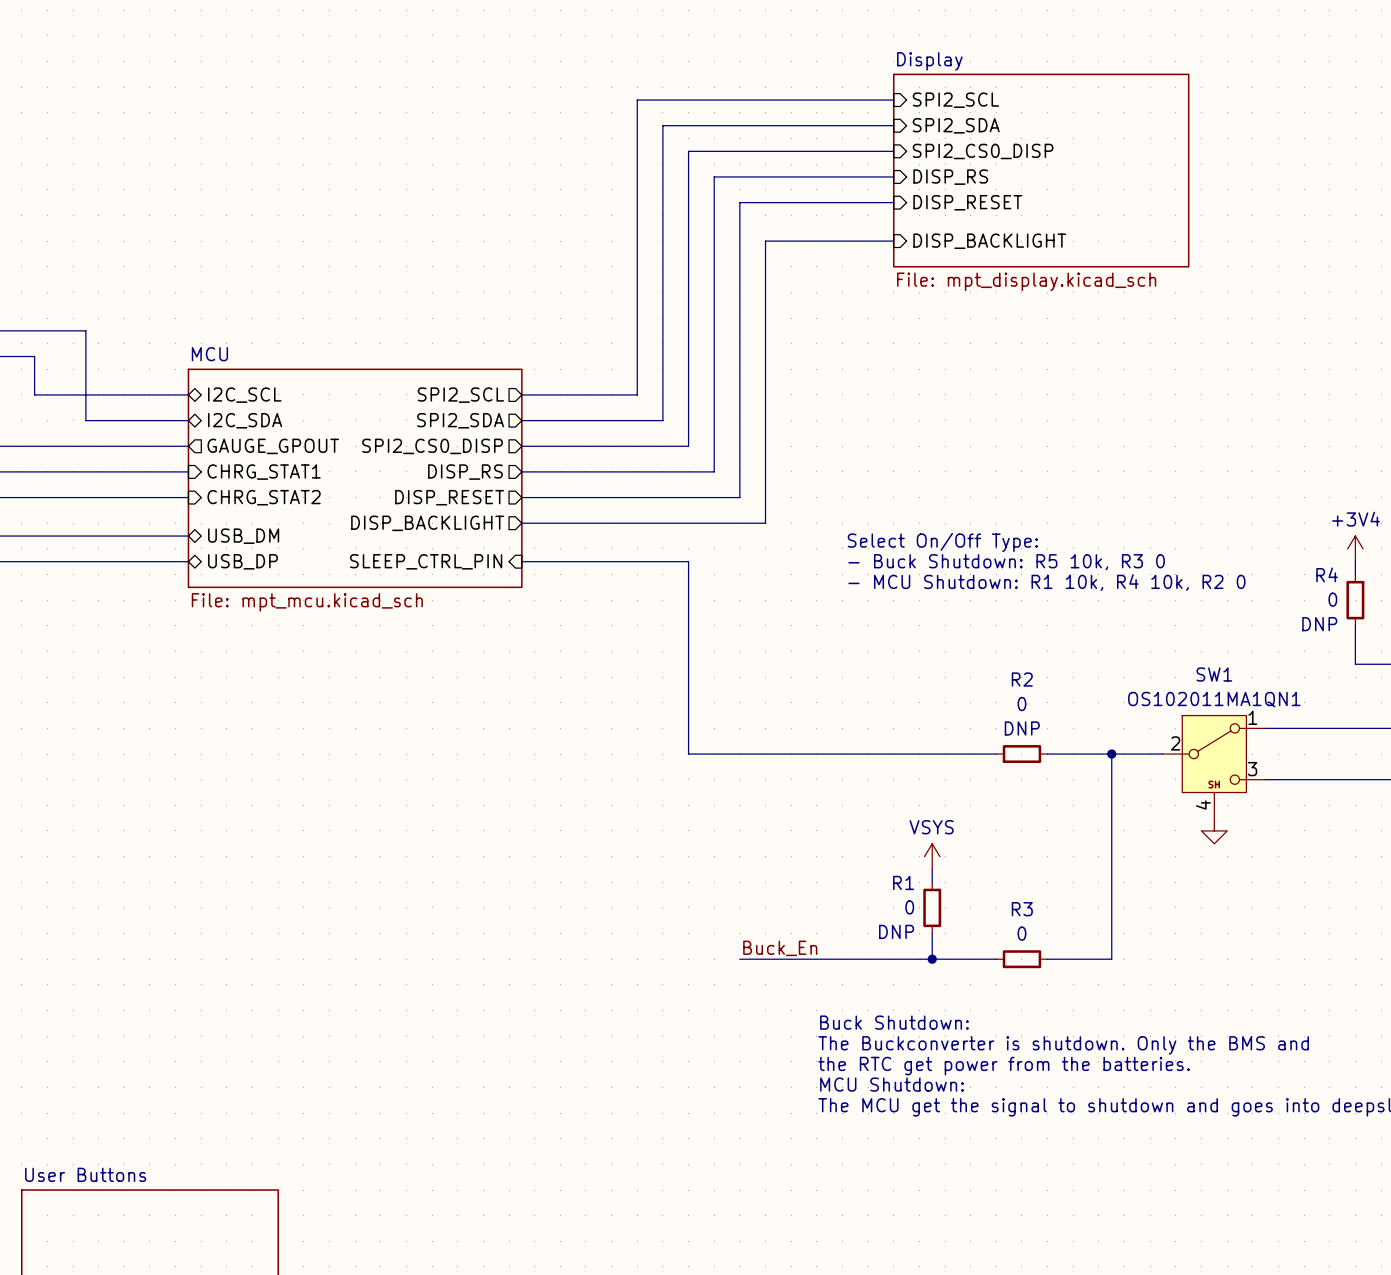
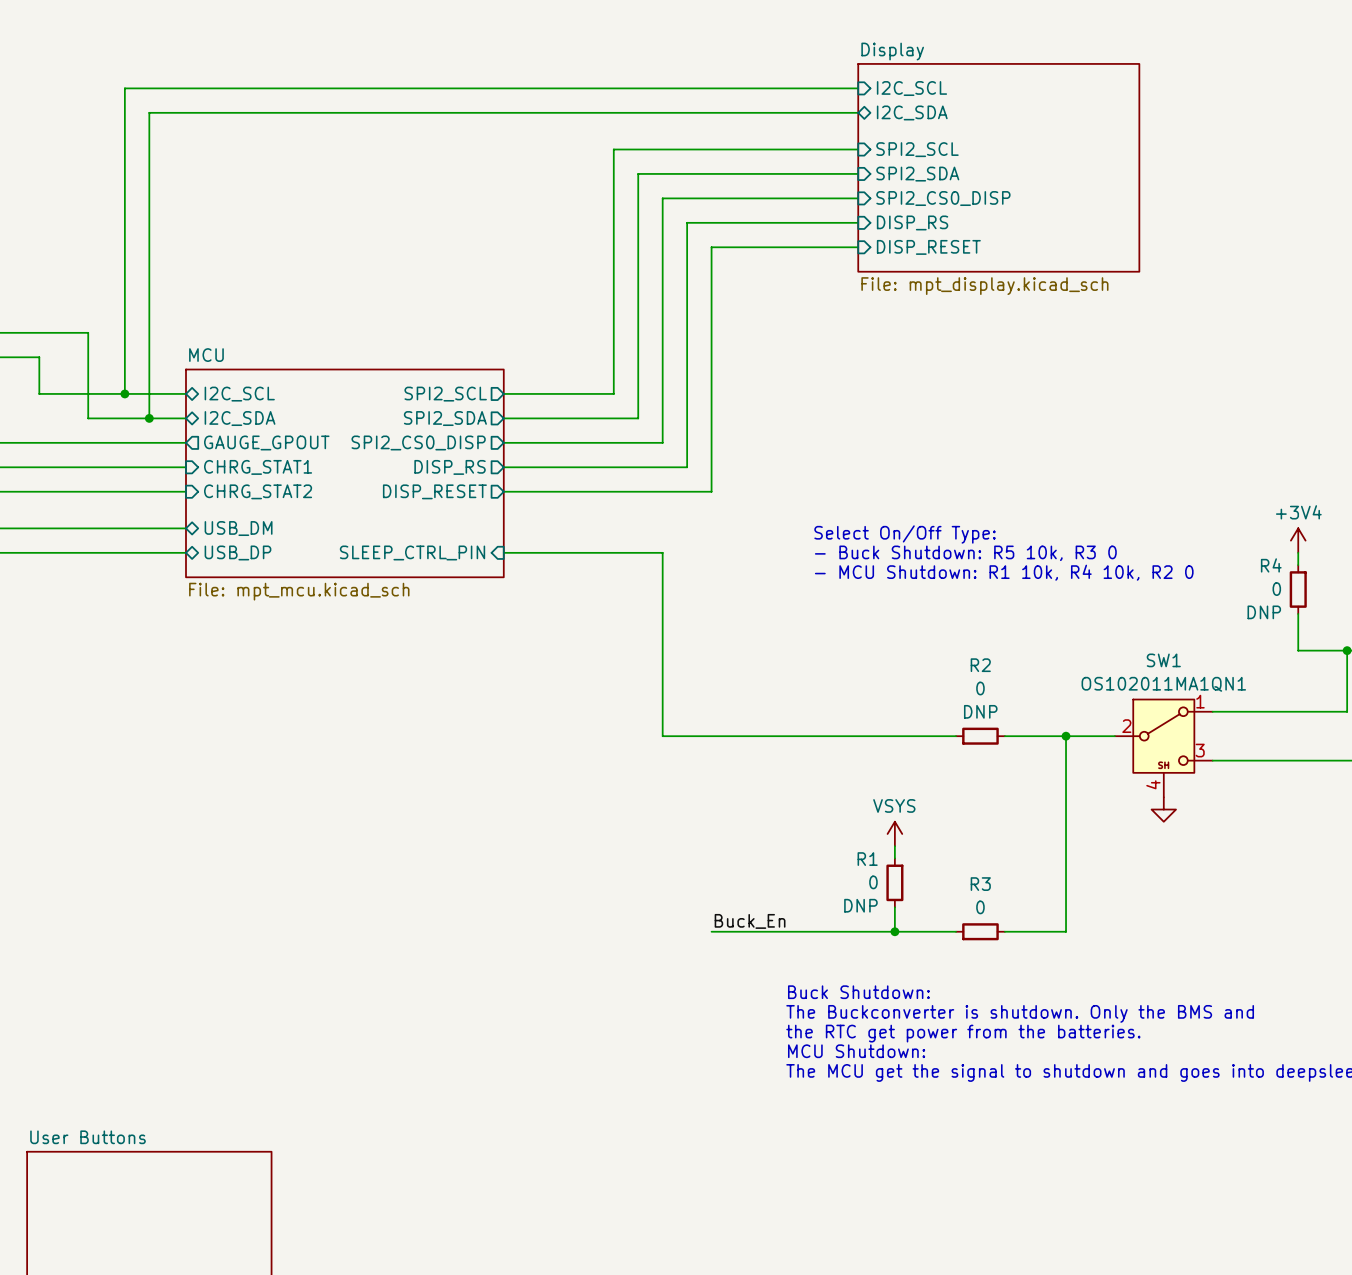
wire: none -> (858, 88) (124, 88) (124, 393)
sheet pin: none -> I2C_SCL (911, 88)
wire: (637, 100) (637, 138) -> (858, 149) (613, 149)
wire: none -> (613, 112) (149, 112) (149, 418)
sheet pin shape: input (955, 100) -> bidirectional (912, 112)
sheet pin: SPI2_SCL (955, 100) -> I2C_SDA (912, 112)
wire: (893, 125) (662, 125) (662, 164) -> (858, 173) (638, 173)
sheet pin position: SPI2_SDA (956, 125) -> SPI2_SDA (917, 174)
sheet pin: none -> SPI2_SCL (917, 149)
wire: (893, 151) (688, 151) (688, 189) -> (858, 198) (662, 198)
sheet pin position: SPI2_CS0_DISP (983, 151) -> SPI2_CS0_DISP (943, 198)
sheet Display: none -> File: mpt_display.kicad_sch (998, 167)
sheet Display: File: mpt_display.kicad_sch (1041, 170) -> none
wire: (893, 176) (714, 176) (714, 215) -> (858, 222) (687, 222)
sheet pin position: DISP_RS (950, 177) -> DISP_RS (912, 222)
wire: (893, 202) (739, 202) (739, 241) -> (736, 247) (711, 247)
sheet pin: DISP_RESET (967, 202) -> none
wire: (765, 241) (765, 523) (521, 523) -> none
sheet pin: DISP_BACKLIGHT (989, 241) -> DISP_RESET (928, 247)
junction: none -> (124, 393)
junction: none -> (149, 418)
sheet pin: DISP_BACKLIGHT (427, 523) -> none

